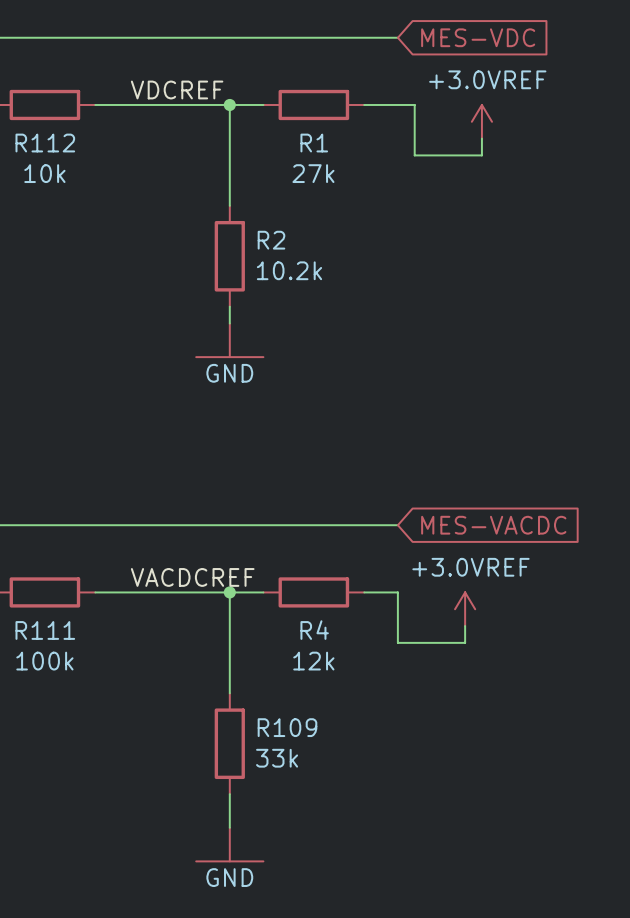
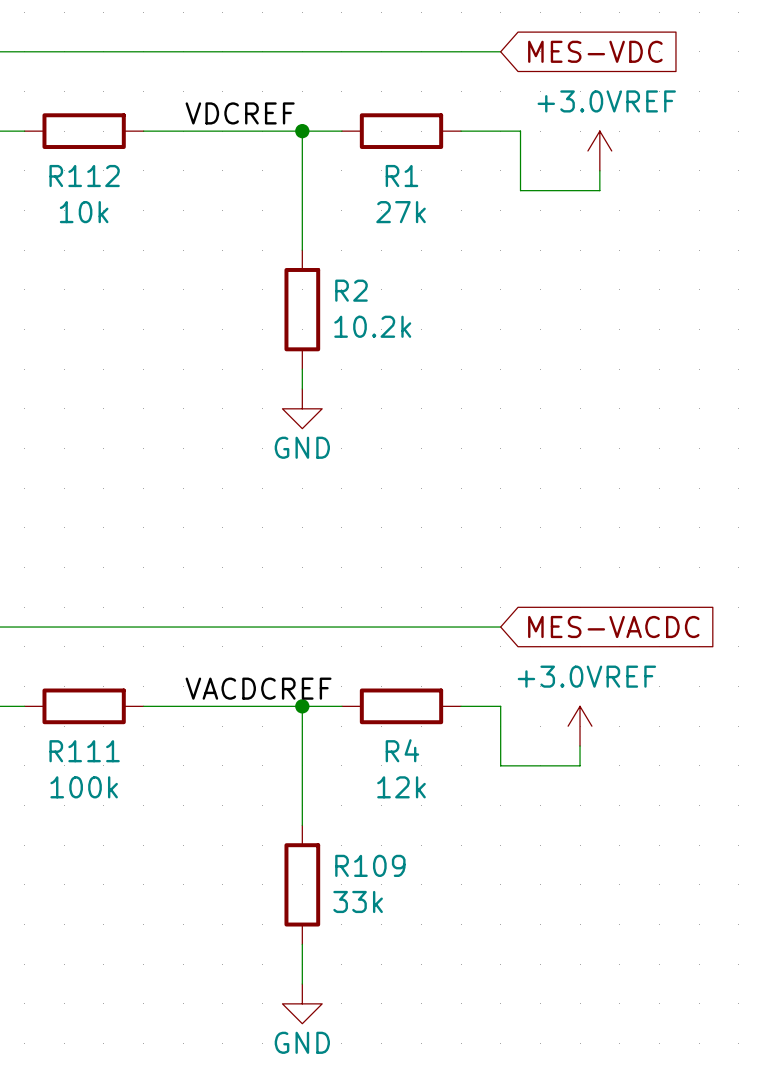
power symbol shape: [196, 323, 264, 358] -> [282, 388, 323, 429]
power symbol shape: [196, 827, 264, 862] -> [282, 984, 323, 1024]

